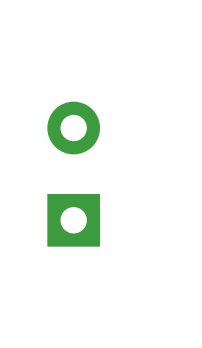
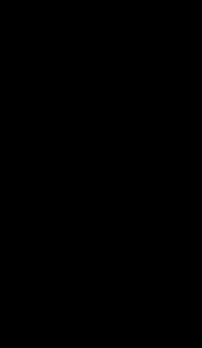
part: (73, 174) -> none

